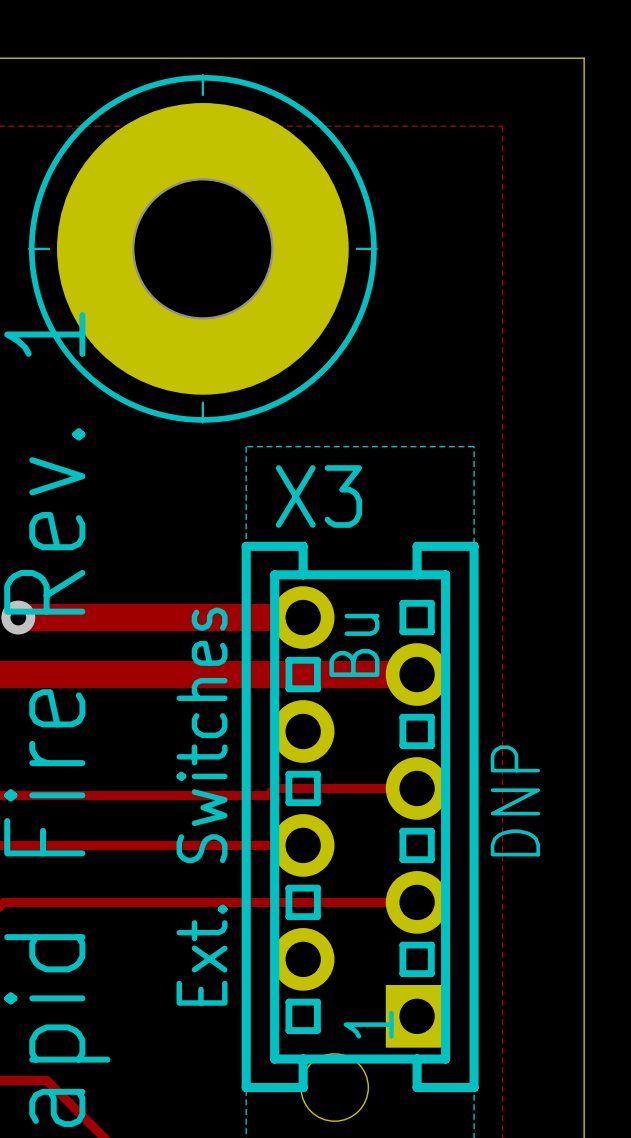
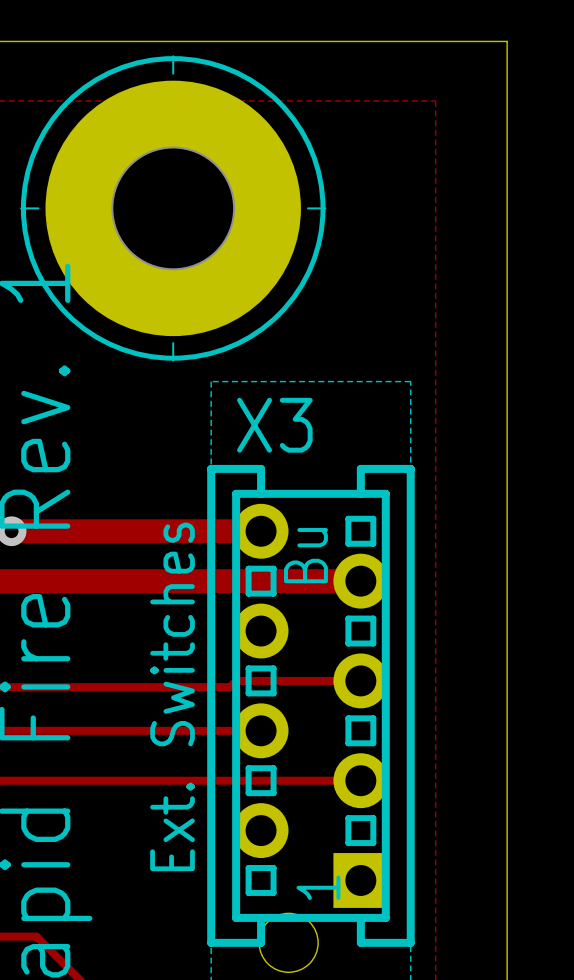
text: DNP (515, 800) -> none

